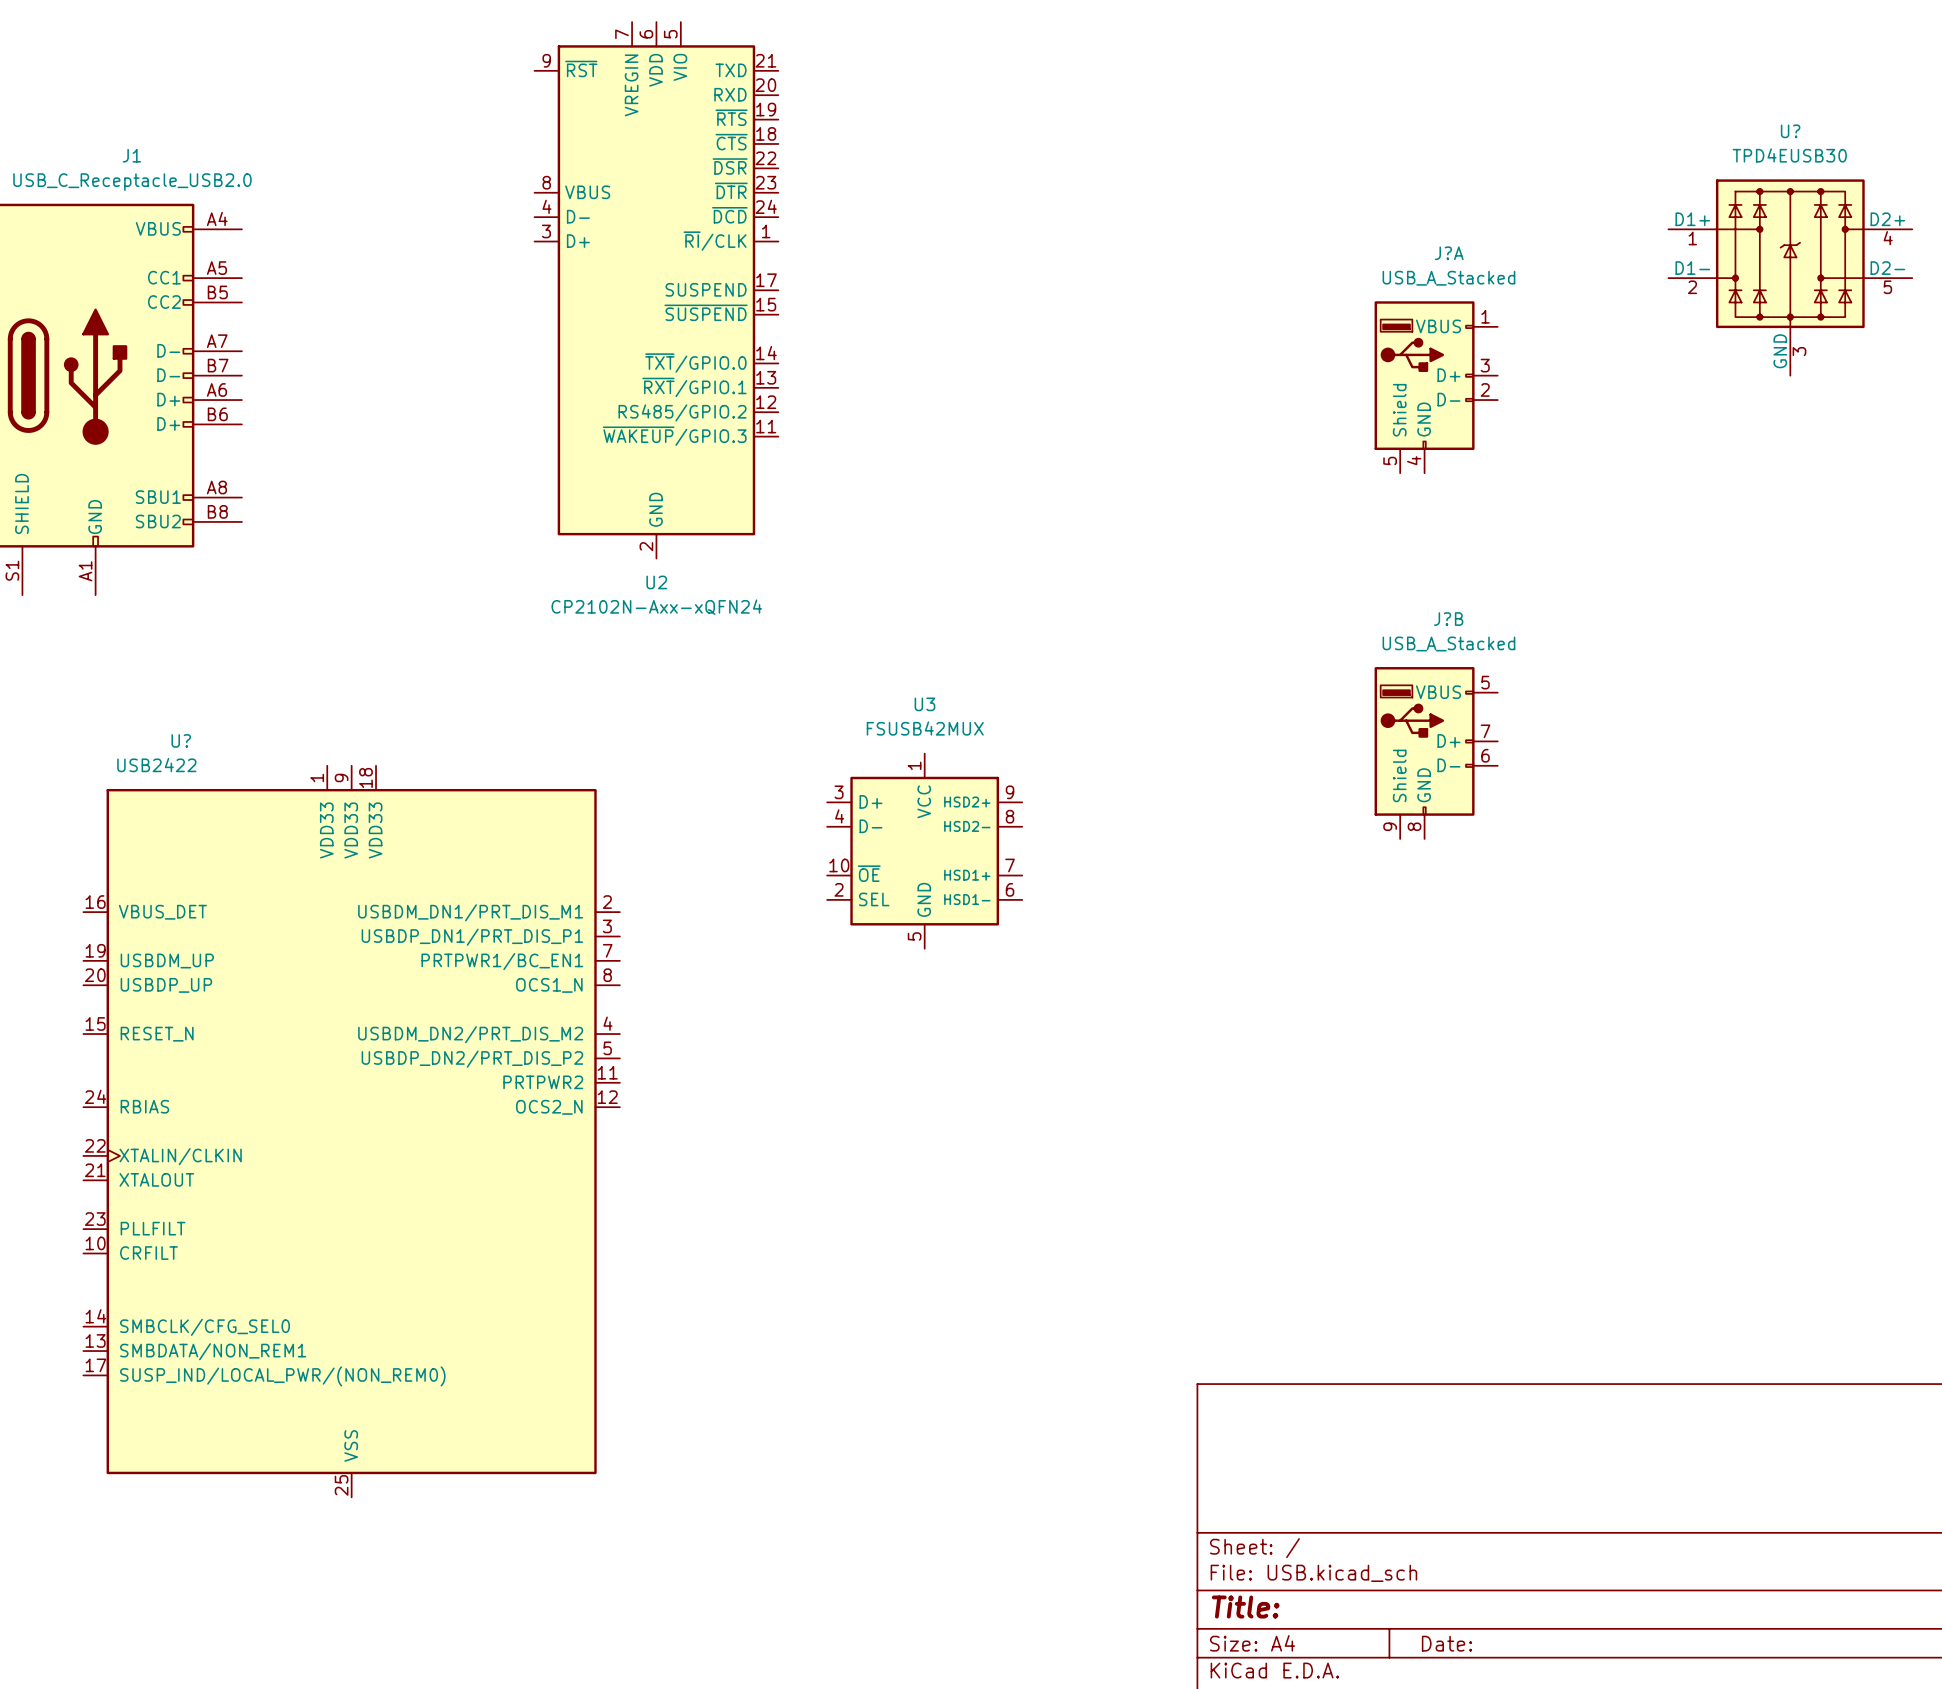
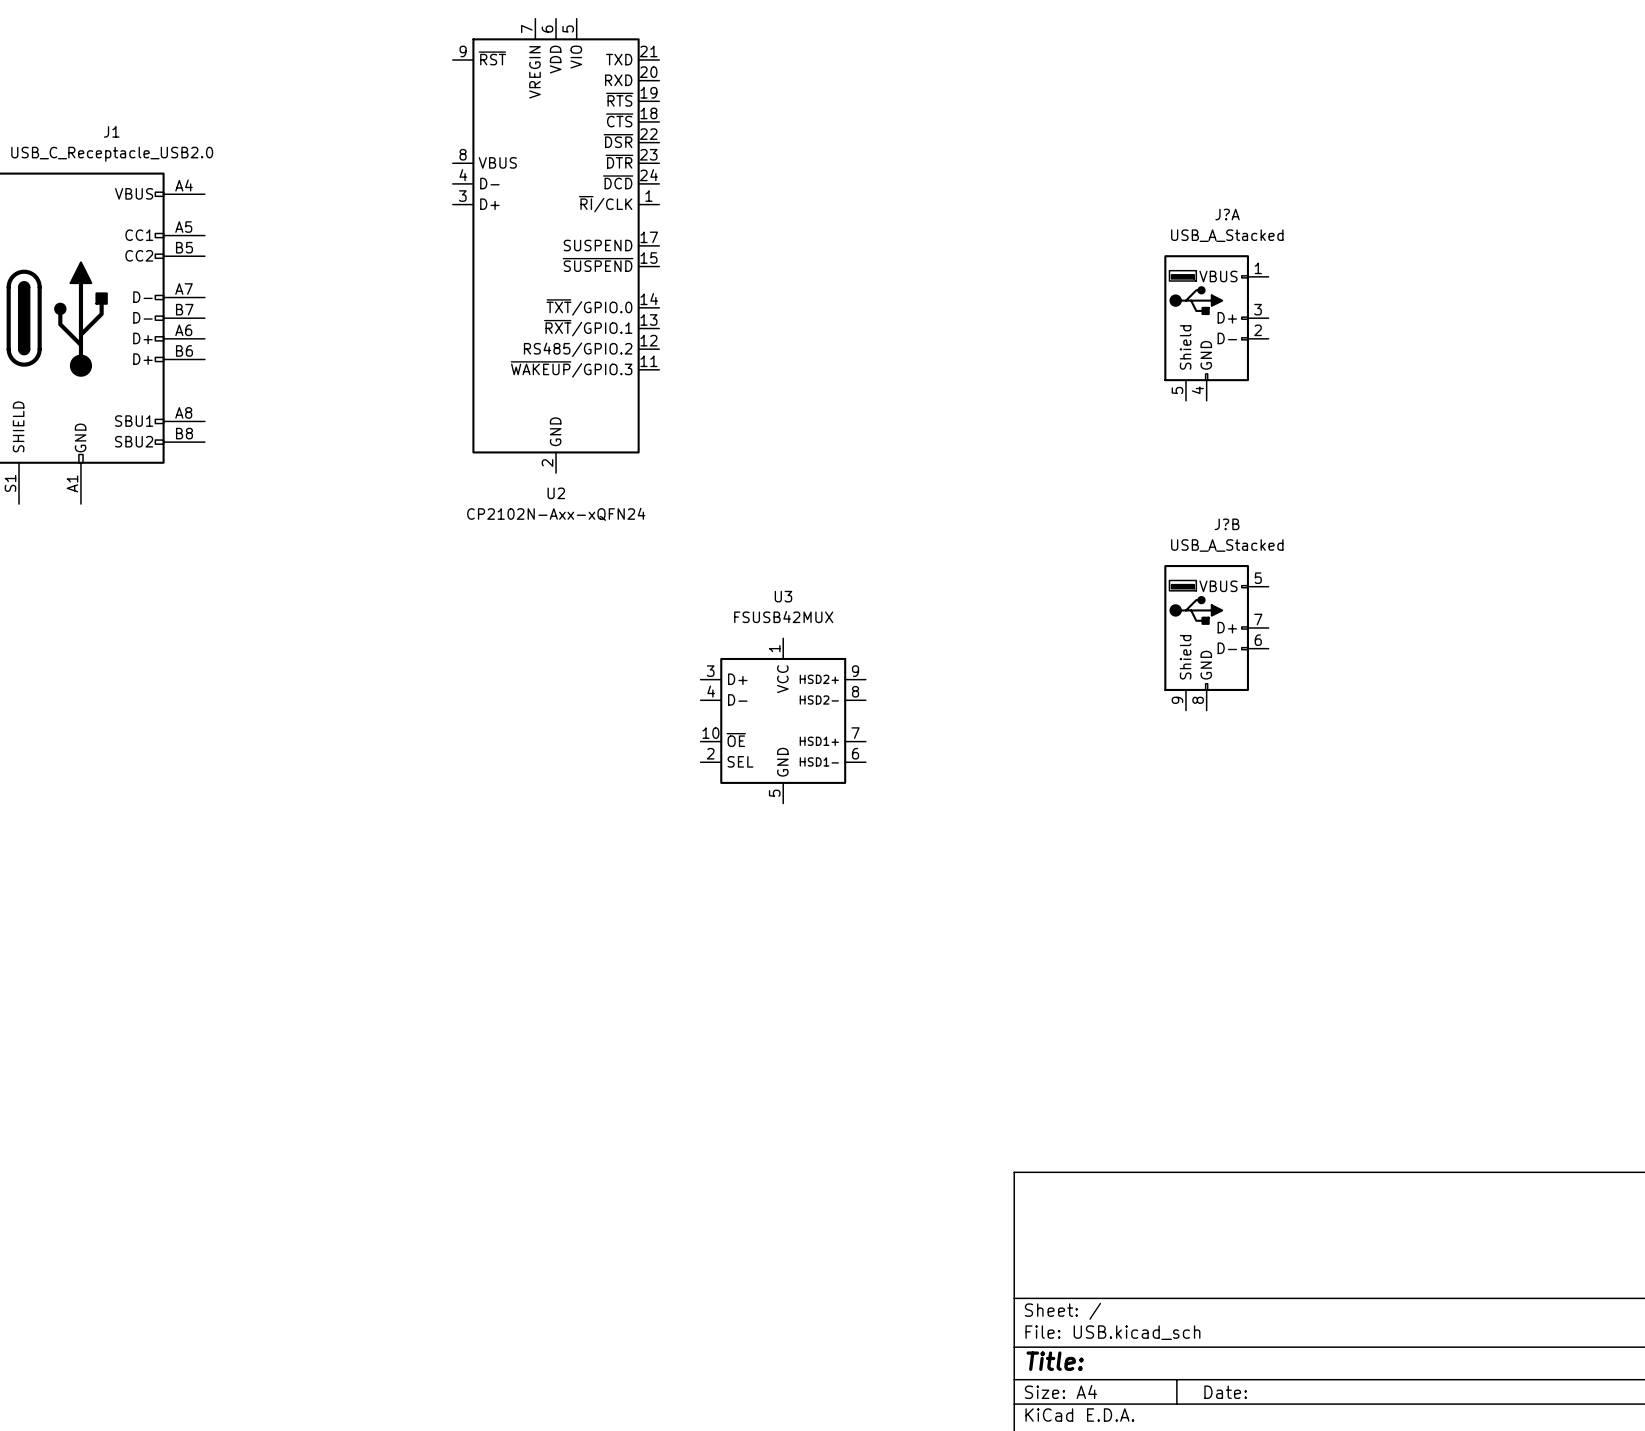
U?: TPD4EUSB30 (1790, 277) -> none
U?: USB2422 (351, 1131) -> none

